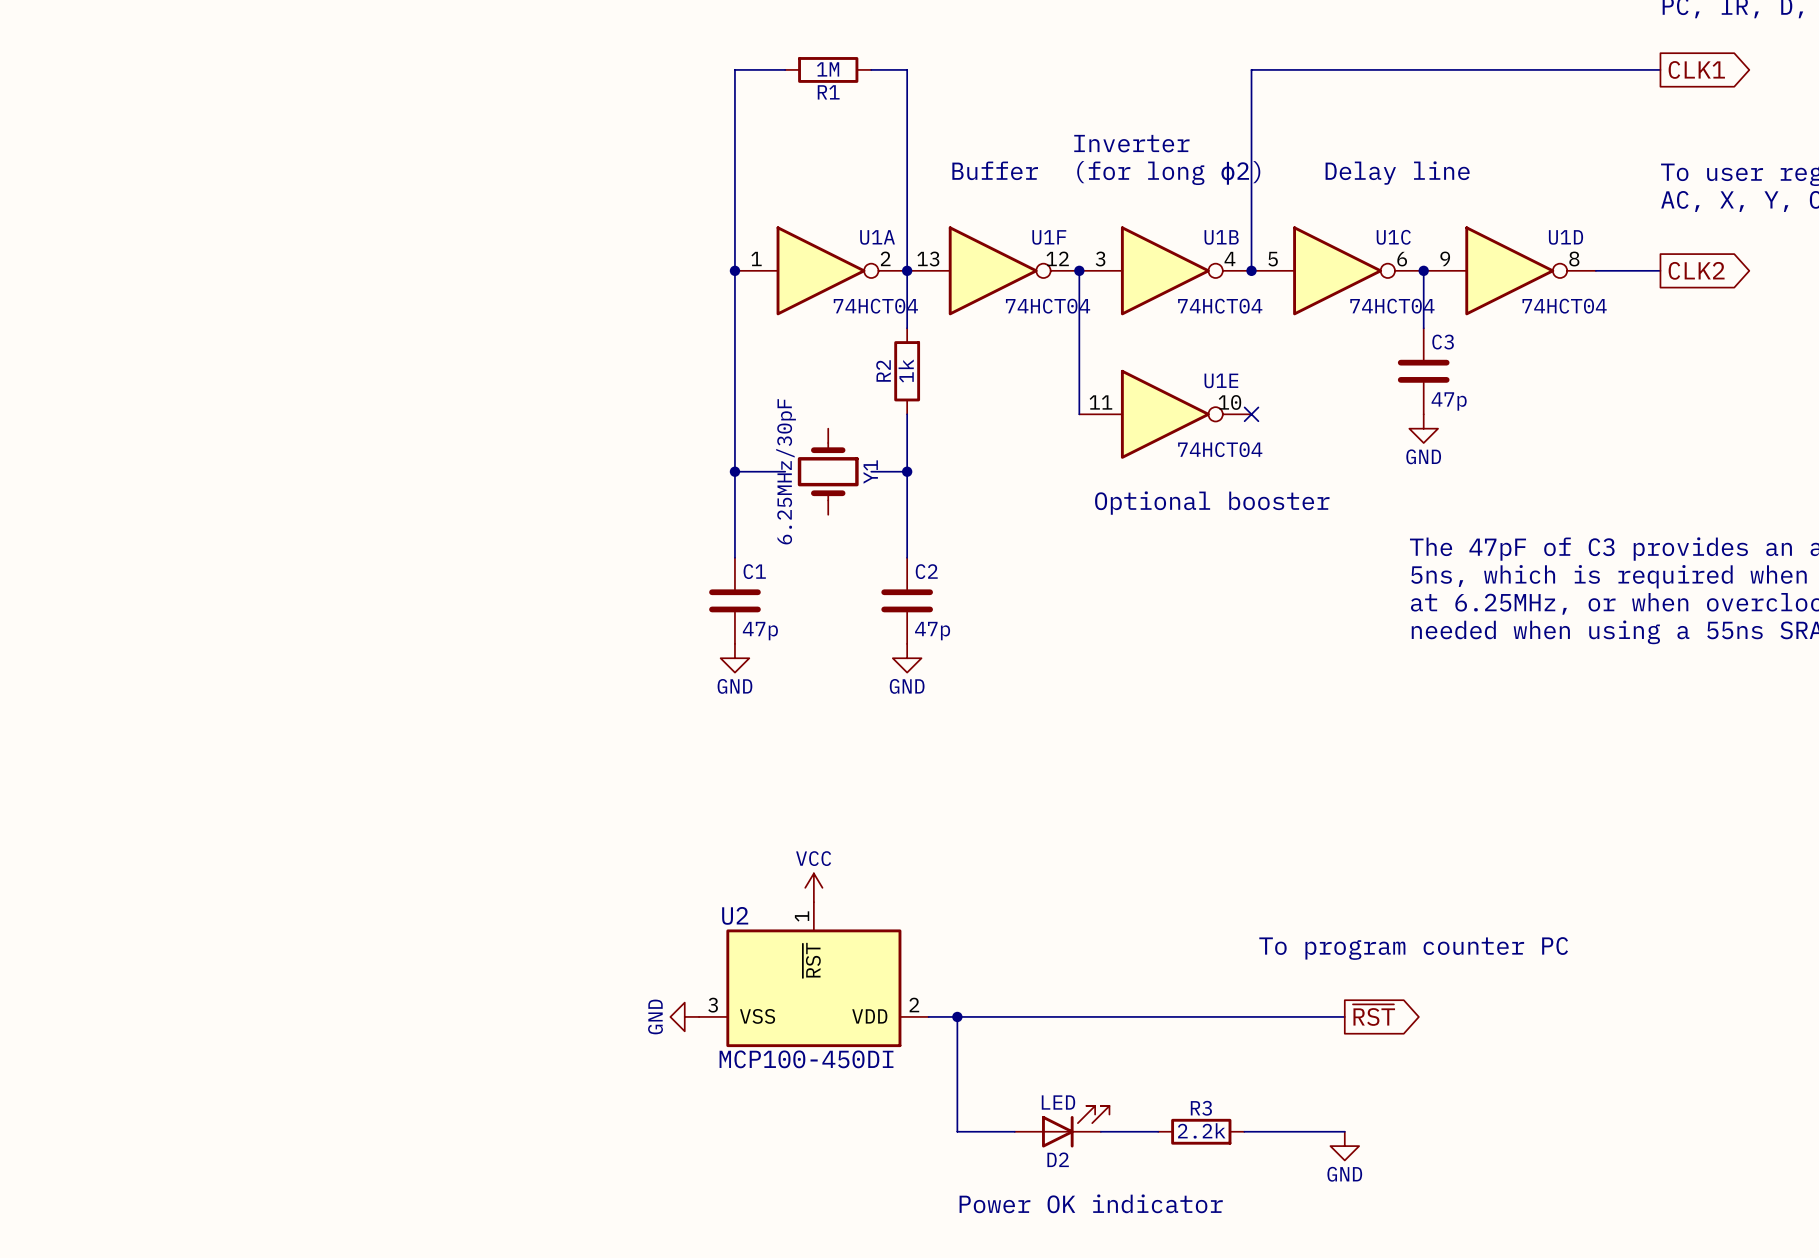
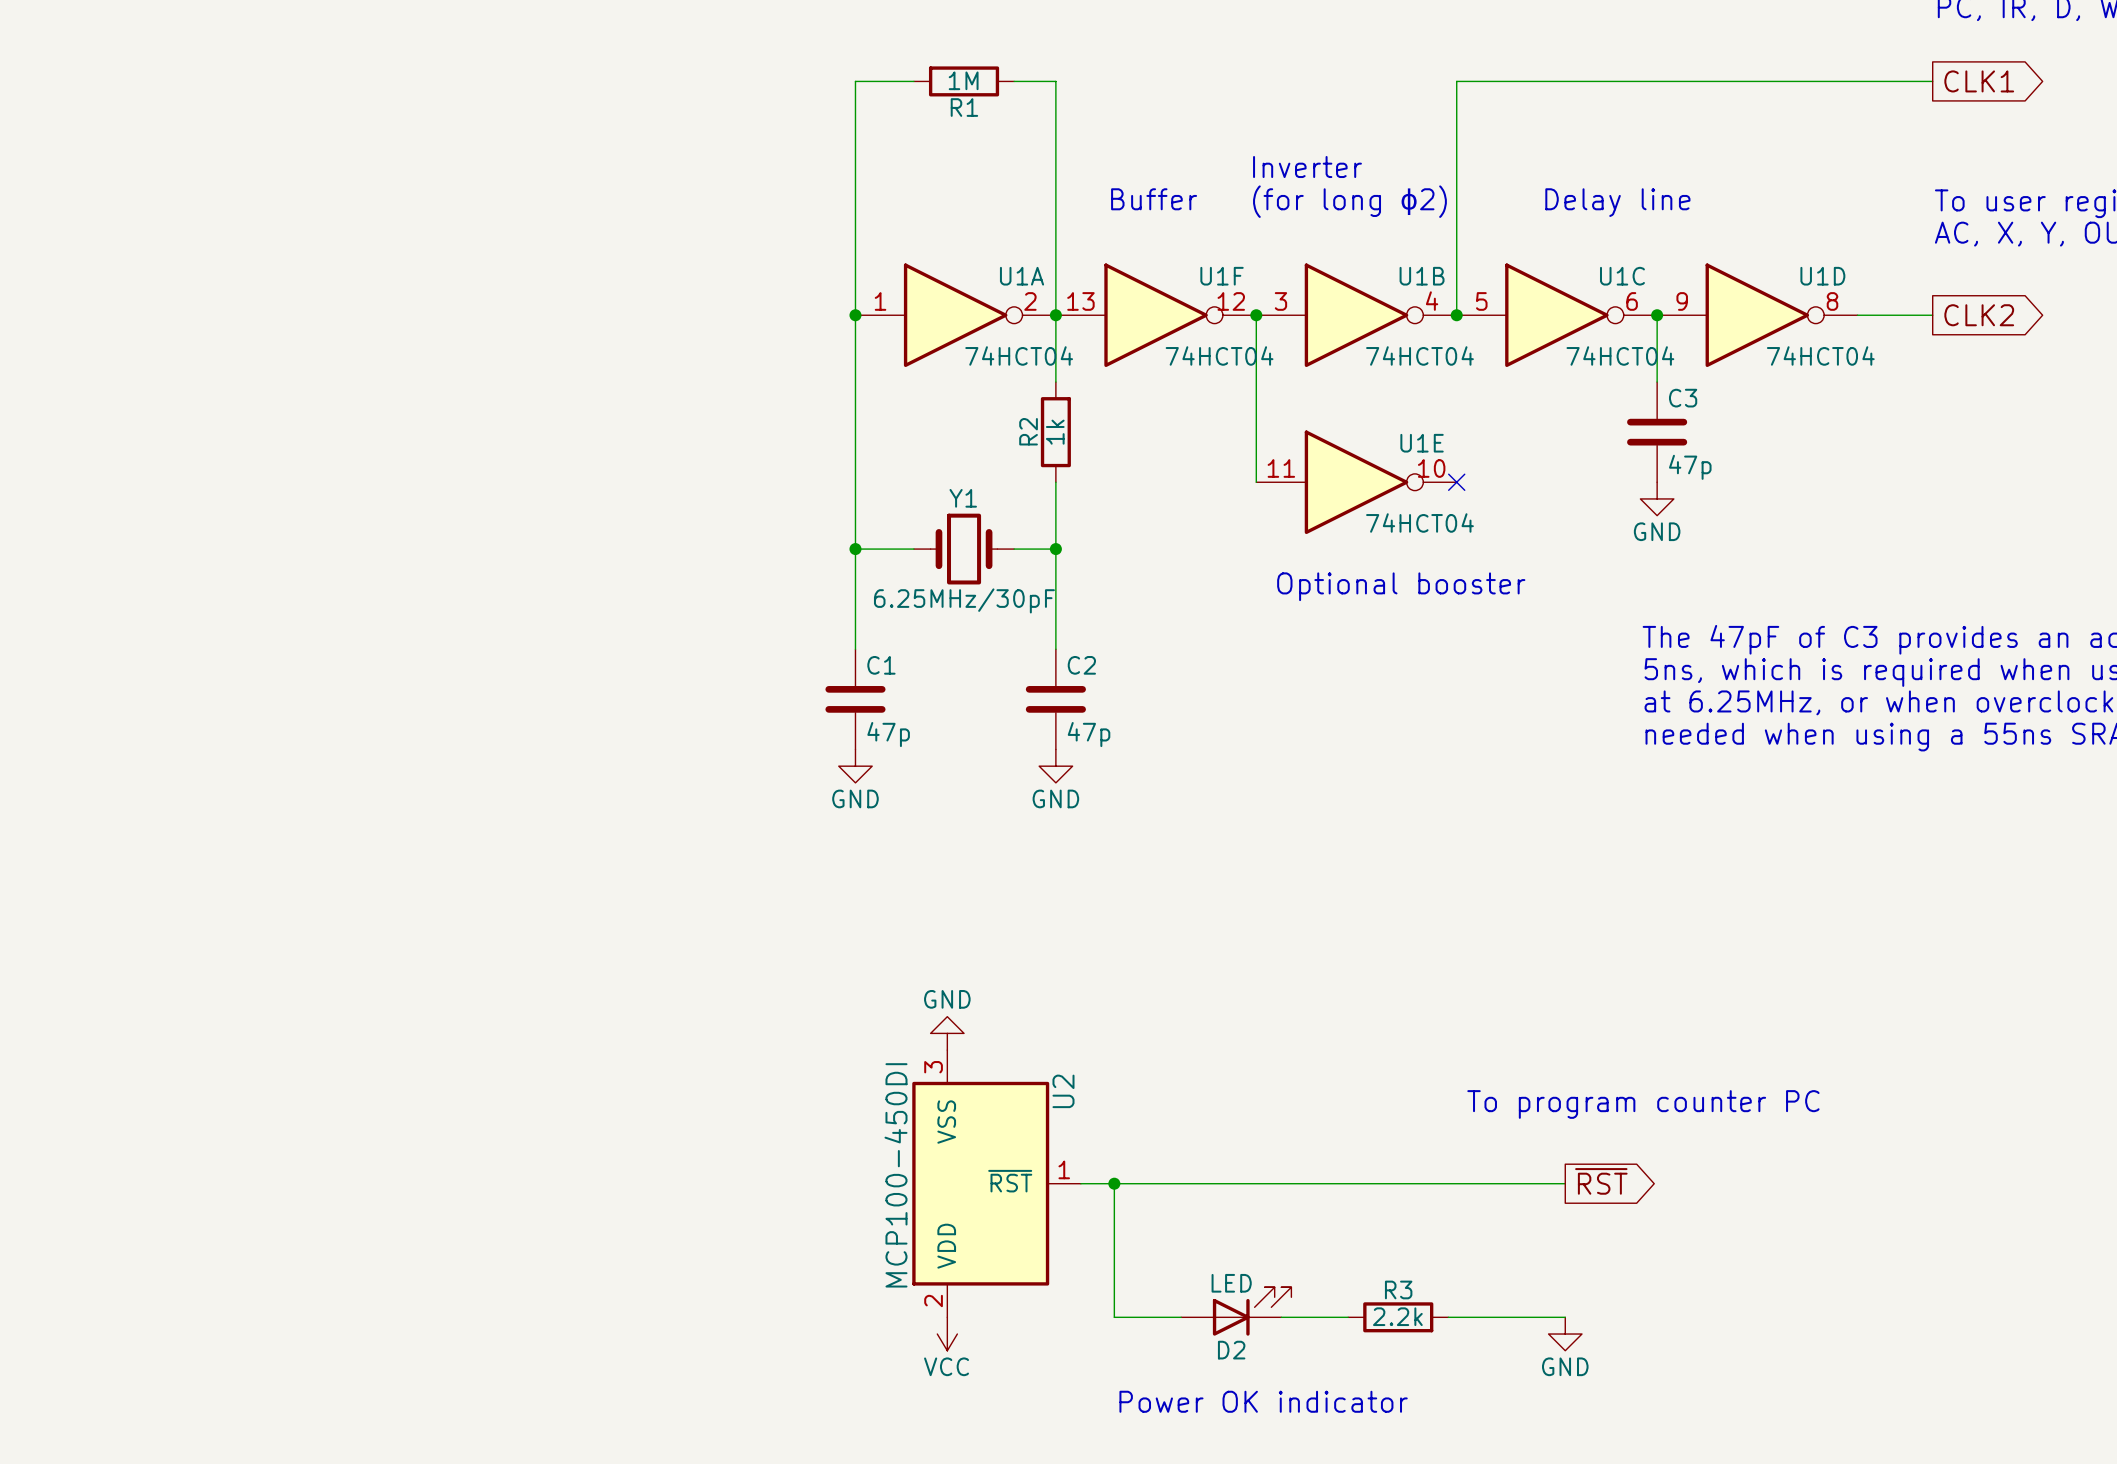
Y1 value position: 6.25MHz/30pF (786, 471) -> 6.25MHz/30pF (964, 600)
Y1 rotation: 0° (828, 471) -> 90° clockwise (964, 549)
Y1 name position: Y1 (870, 472) -> Y1 (963, 498)
power symbol: VCC (813, 887) -> GND (947, 1033)
U2 rotation: 0° (813, 988) -> 90° clockwise (980, 1183)
power symbol: GND (684, 1016) -> none
power symbol: none -> VCC (947, 1334)

